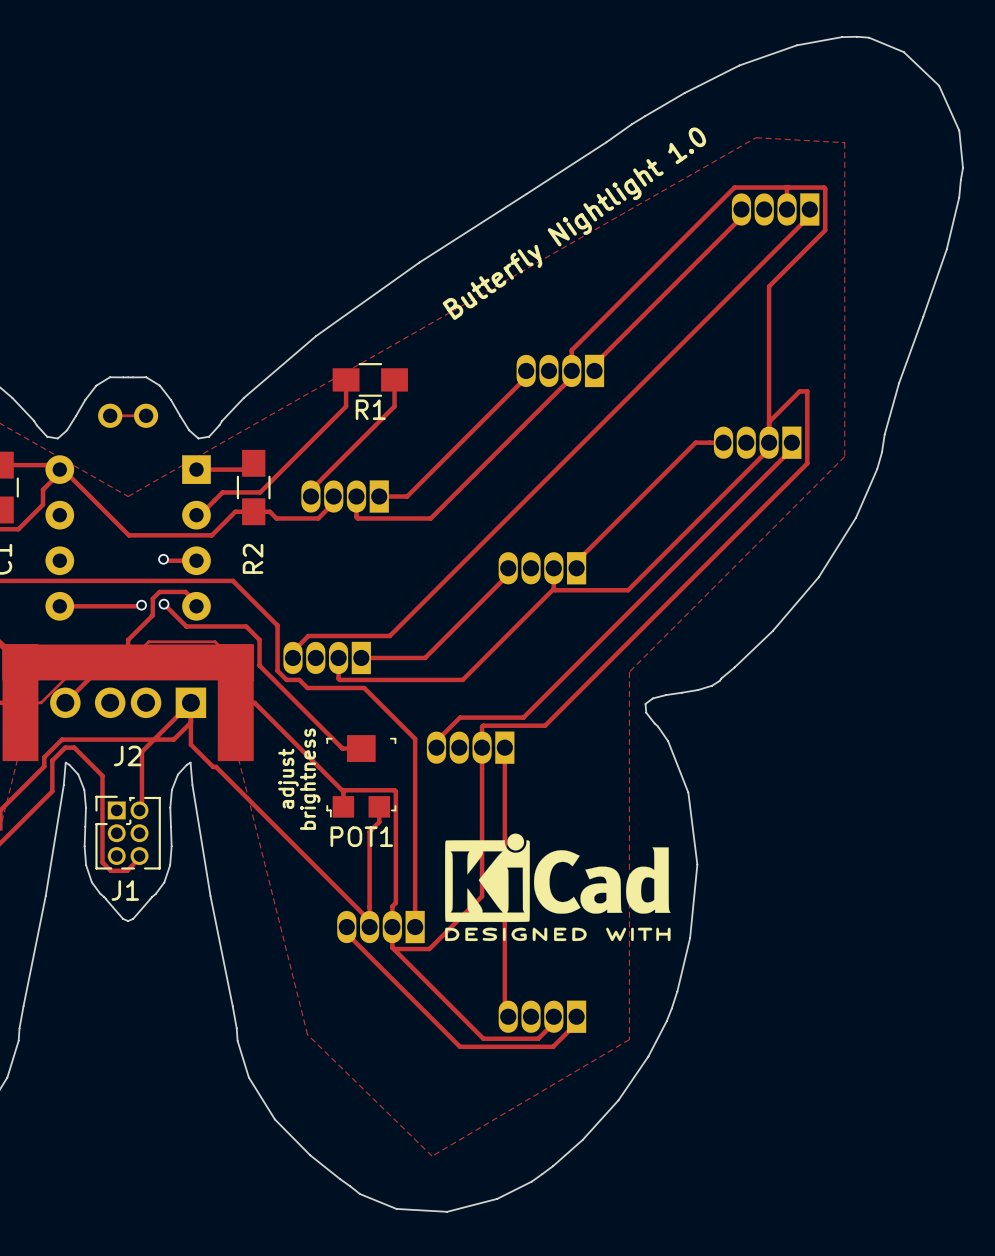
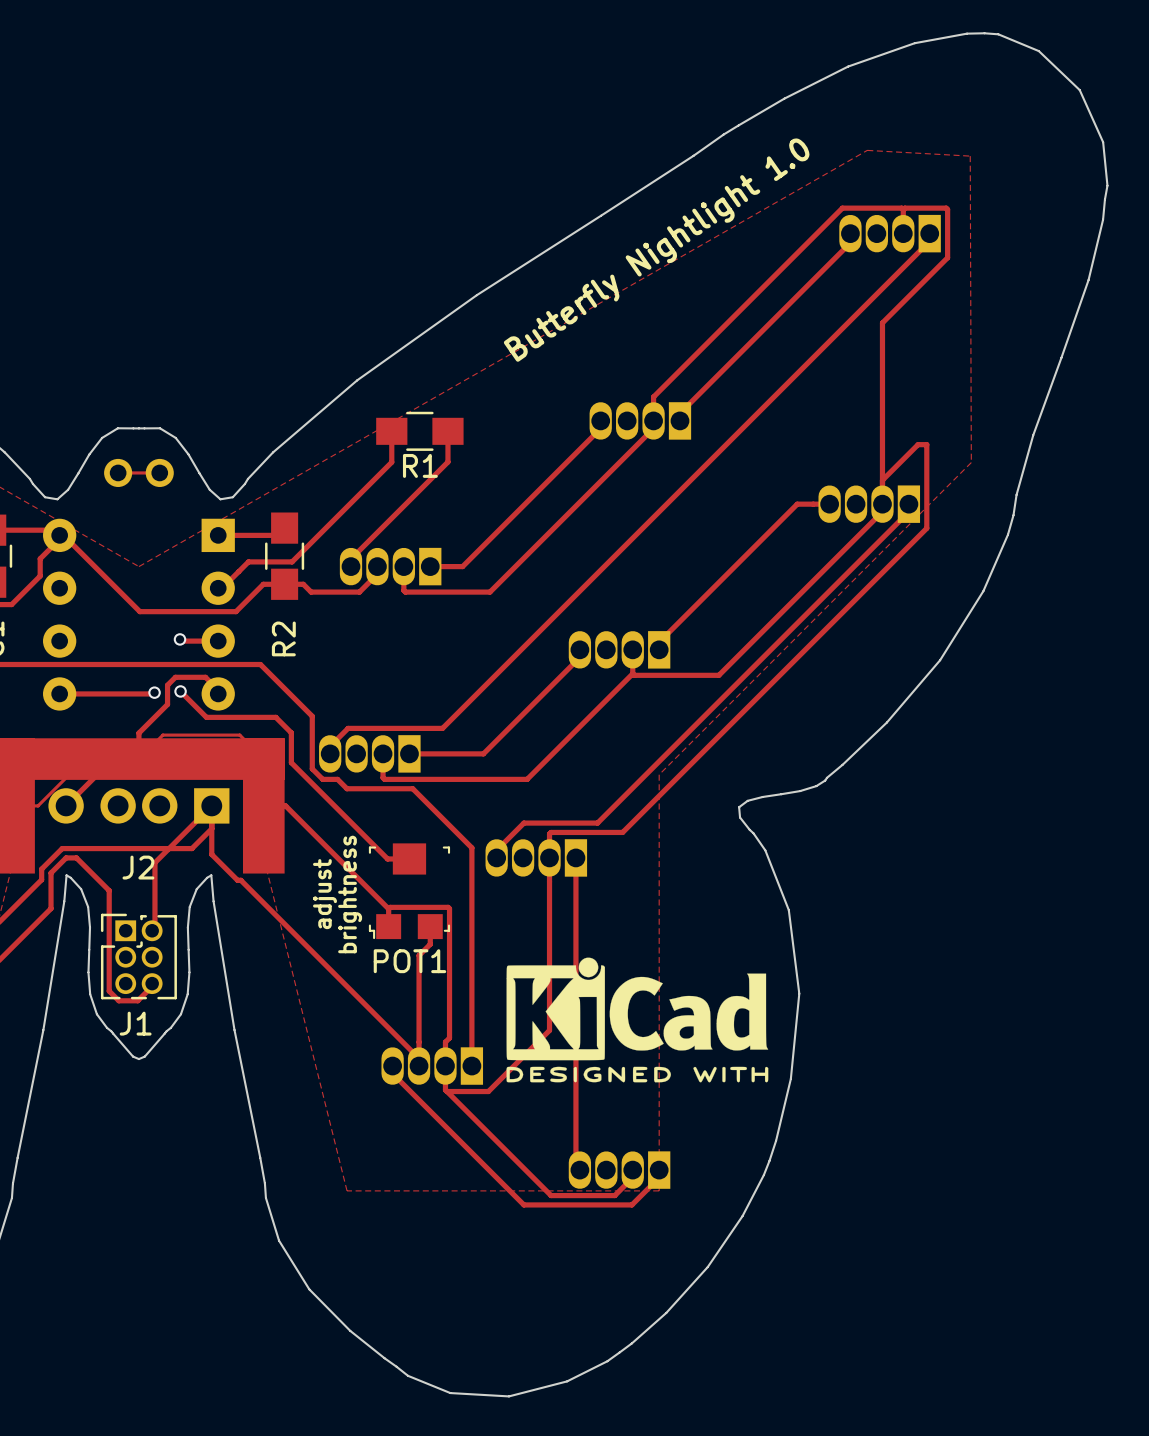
zone outline: (844, 142) (844, 456) (629, 671) (629, 1039) (432, 1156) (307, 1034) -> (970, 156) (971, 462) (659, 774) (659, 1190) (347, 1190)

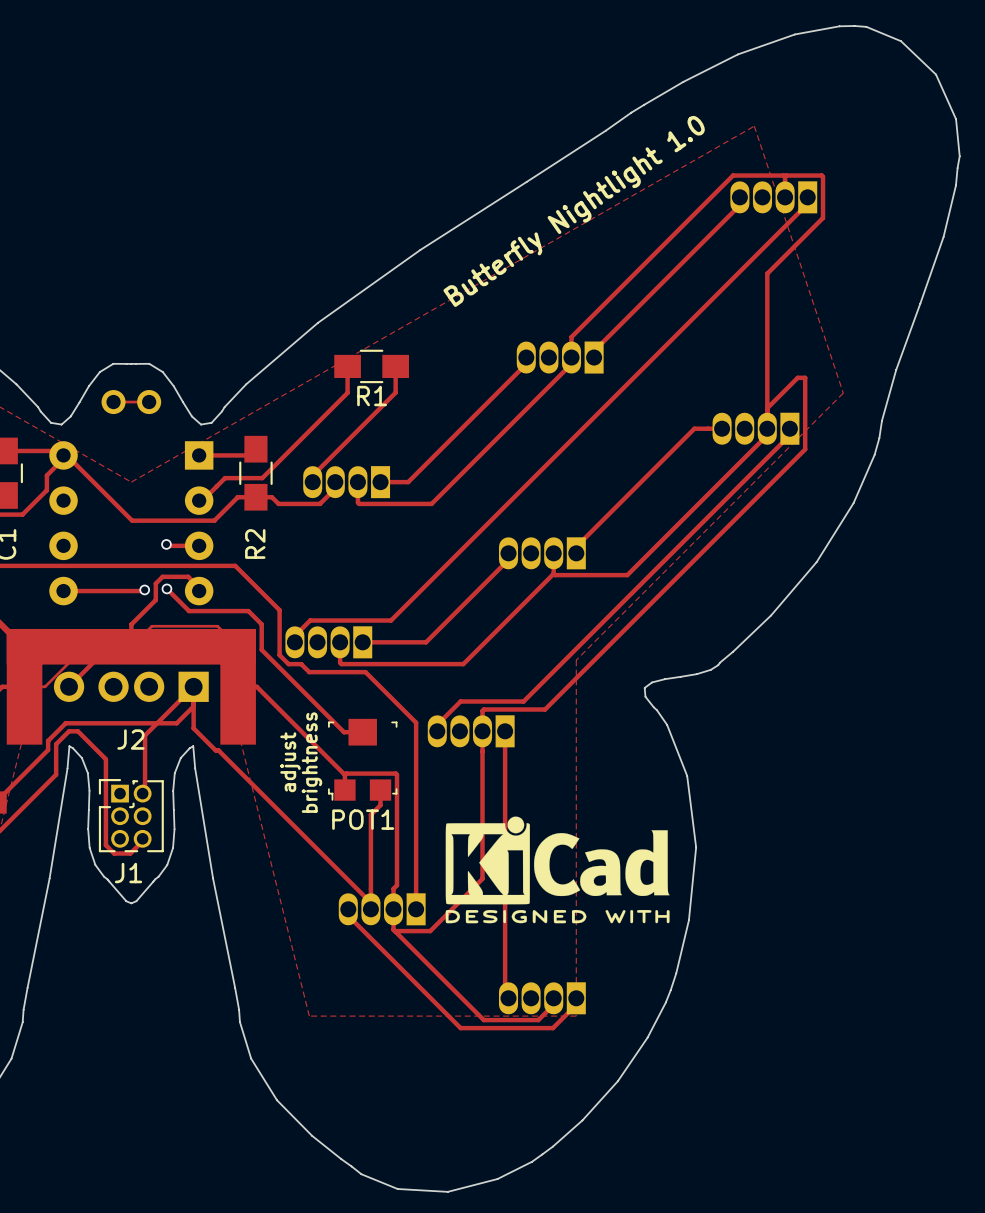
zone outline: (867, 150) (970, 156) (971, 462) -> (754, 126) (843, 393)

